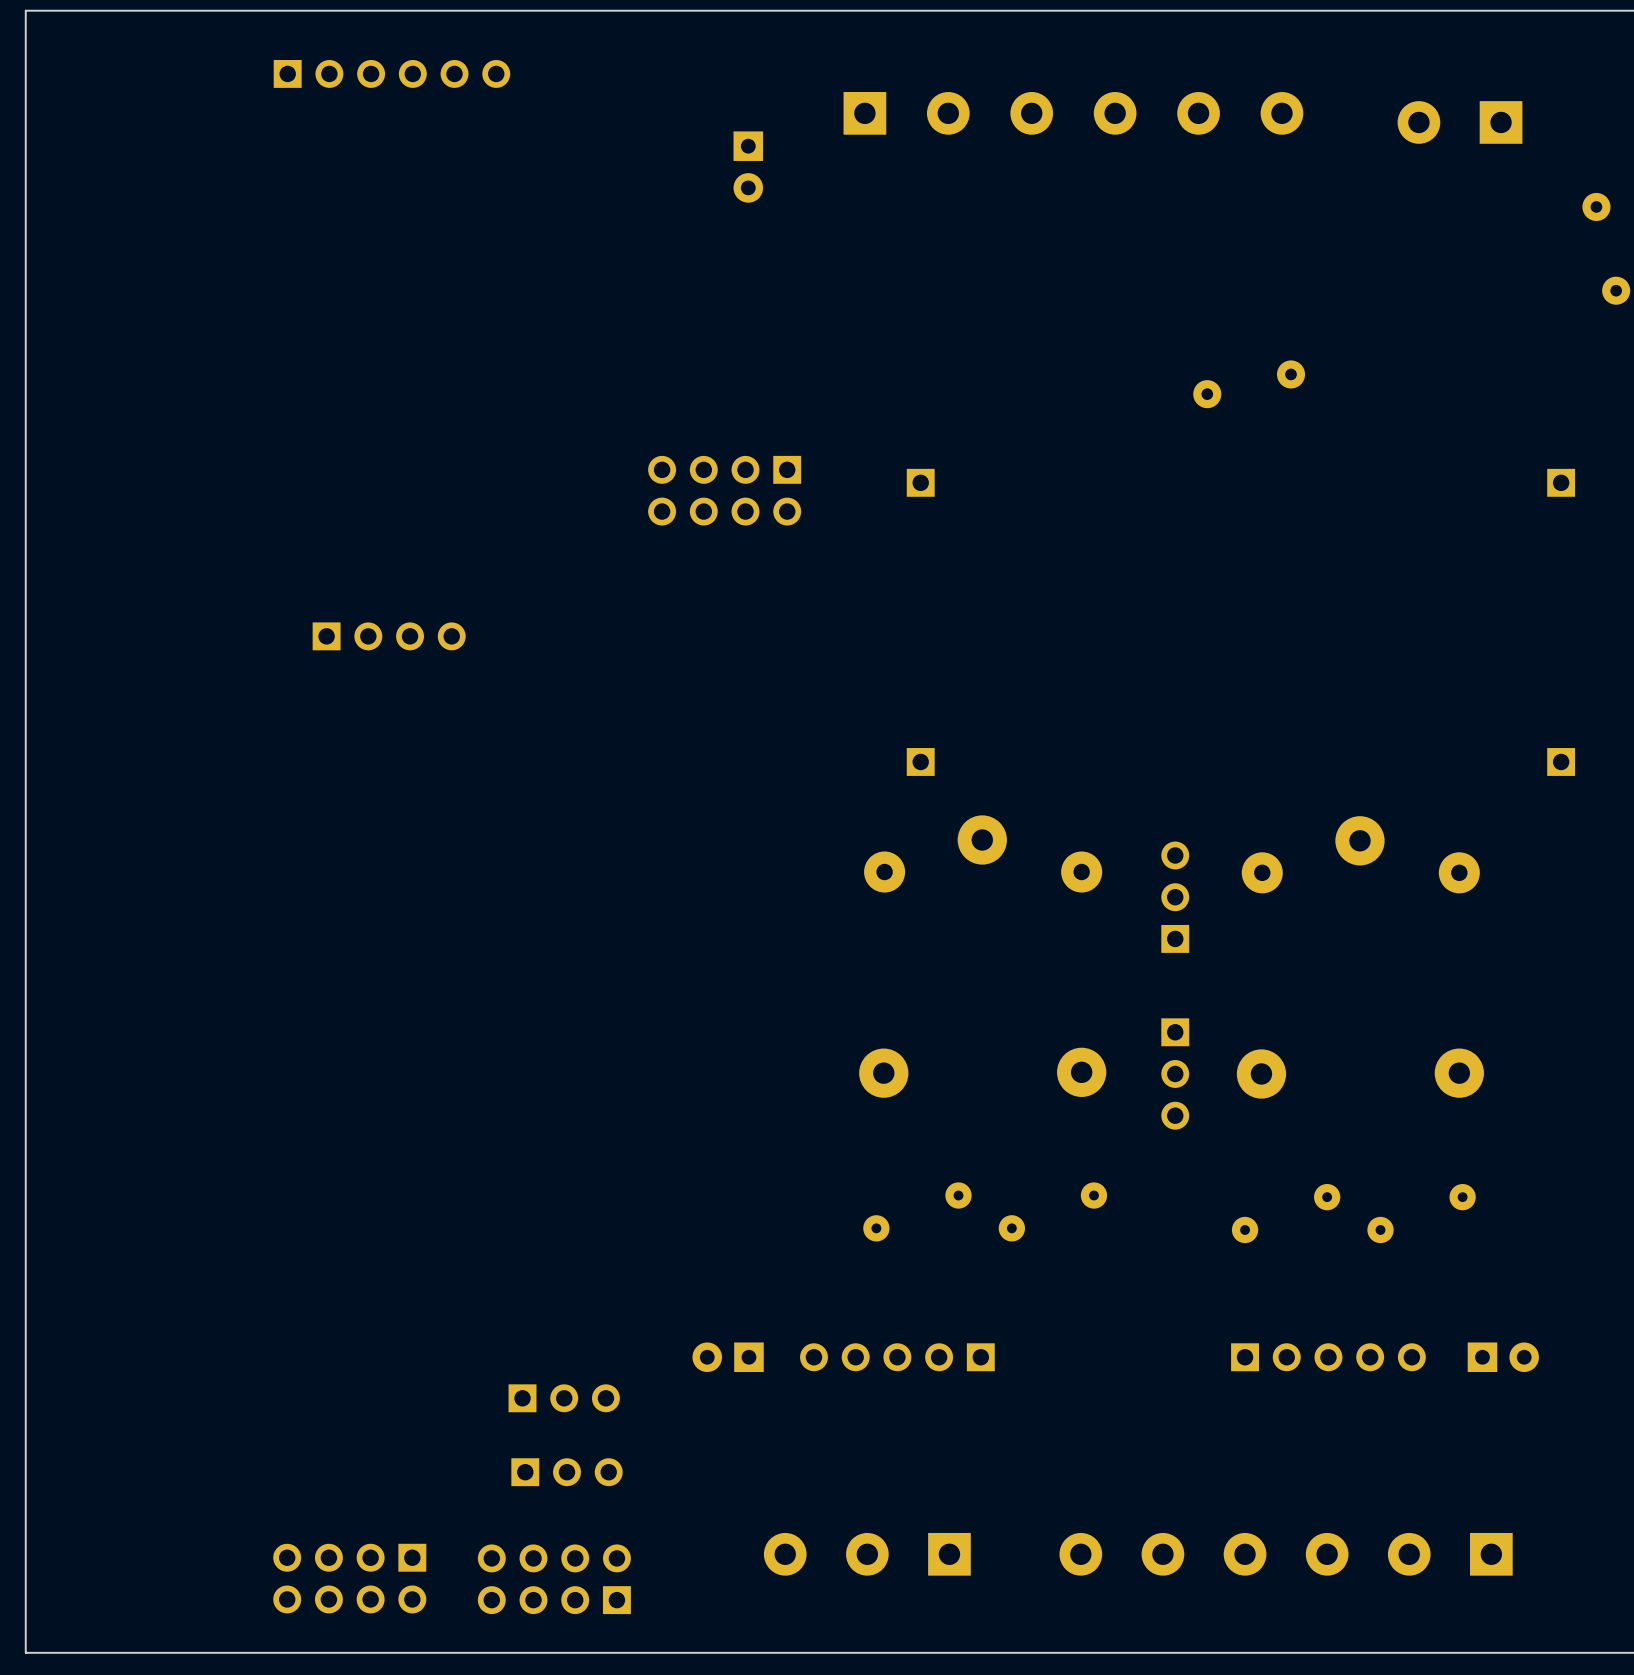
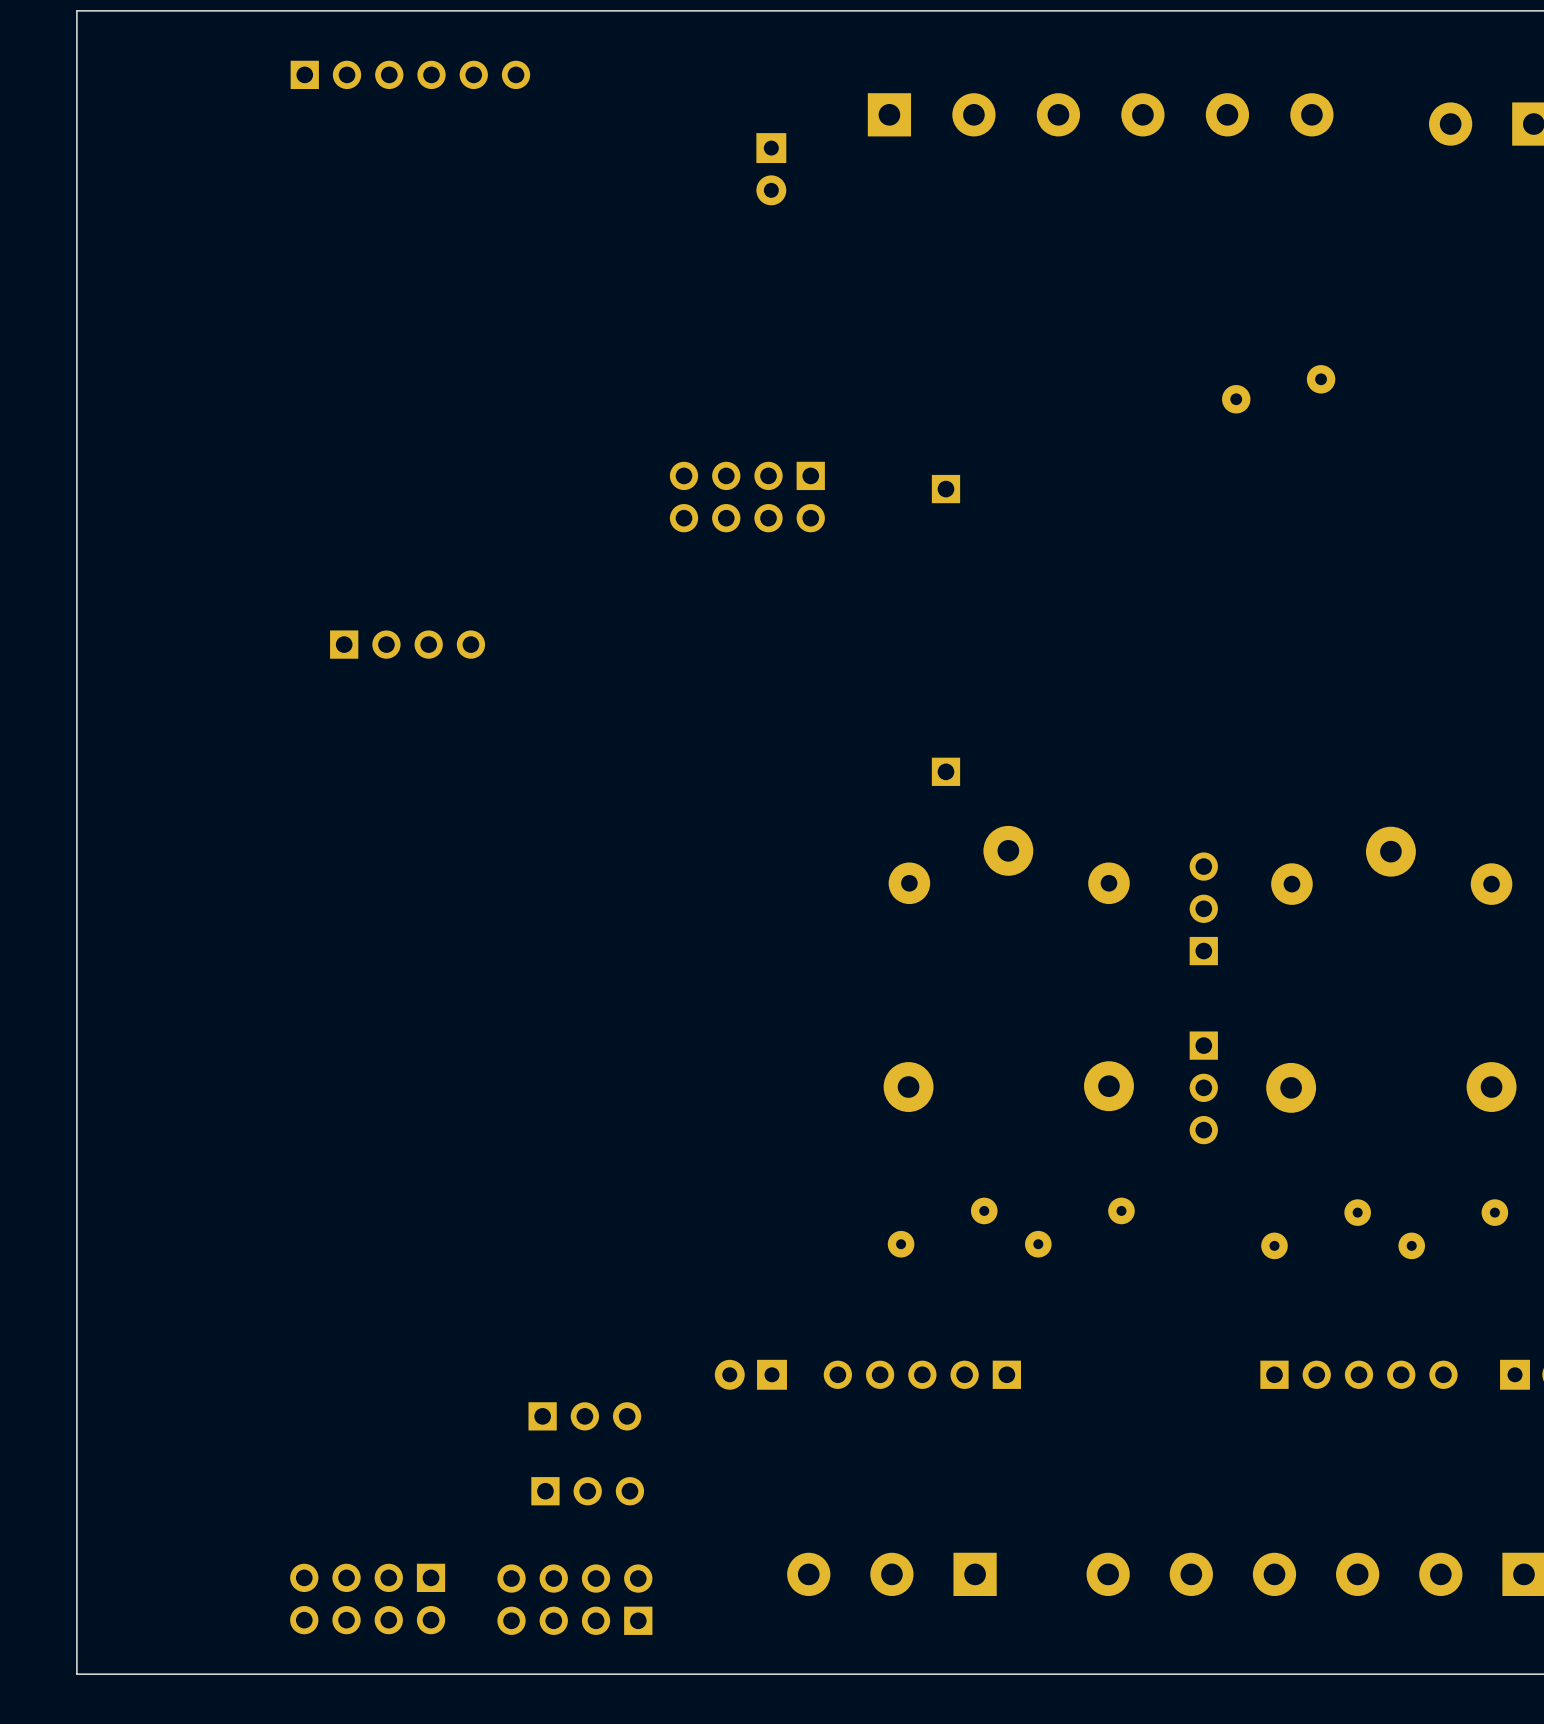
board edge: (62, 10) (25, 10) (25, 1652) (62, 1652) -> (76, 10) (76, 1674)

